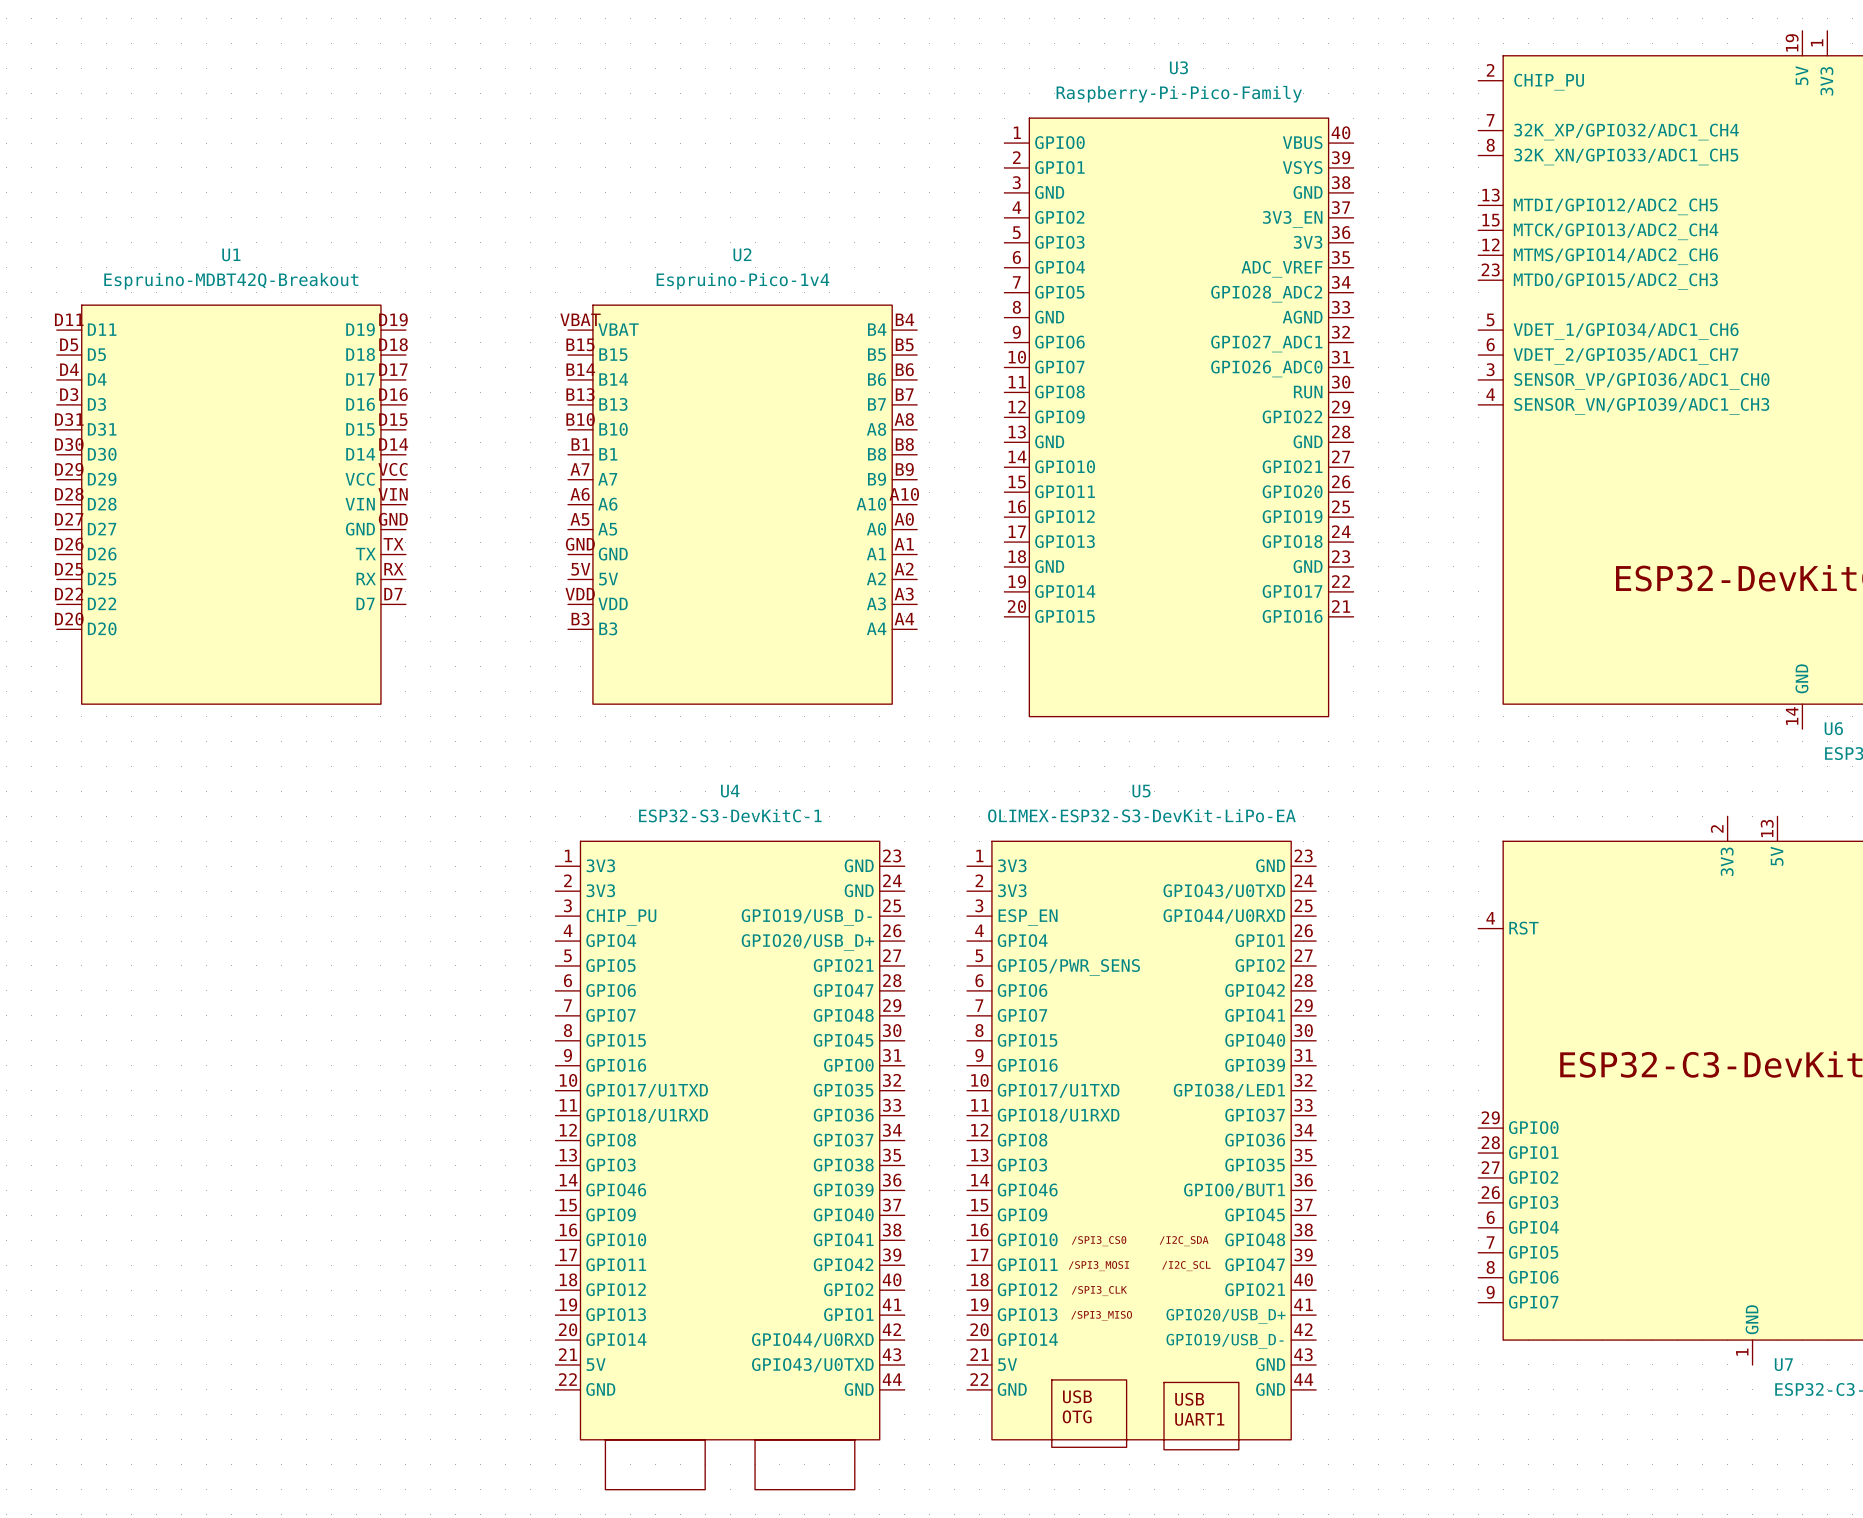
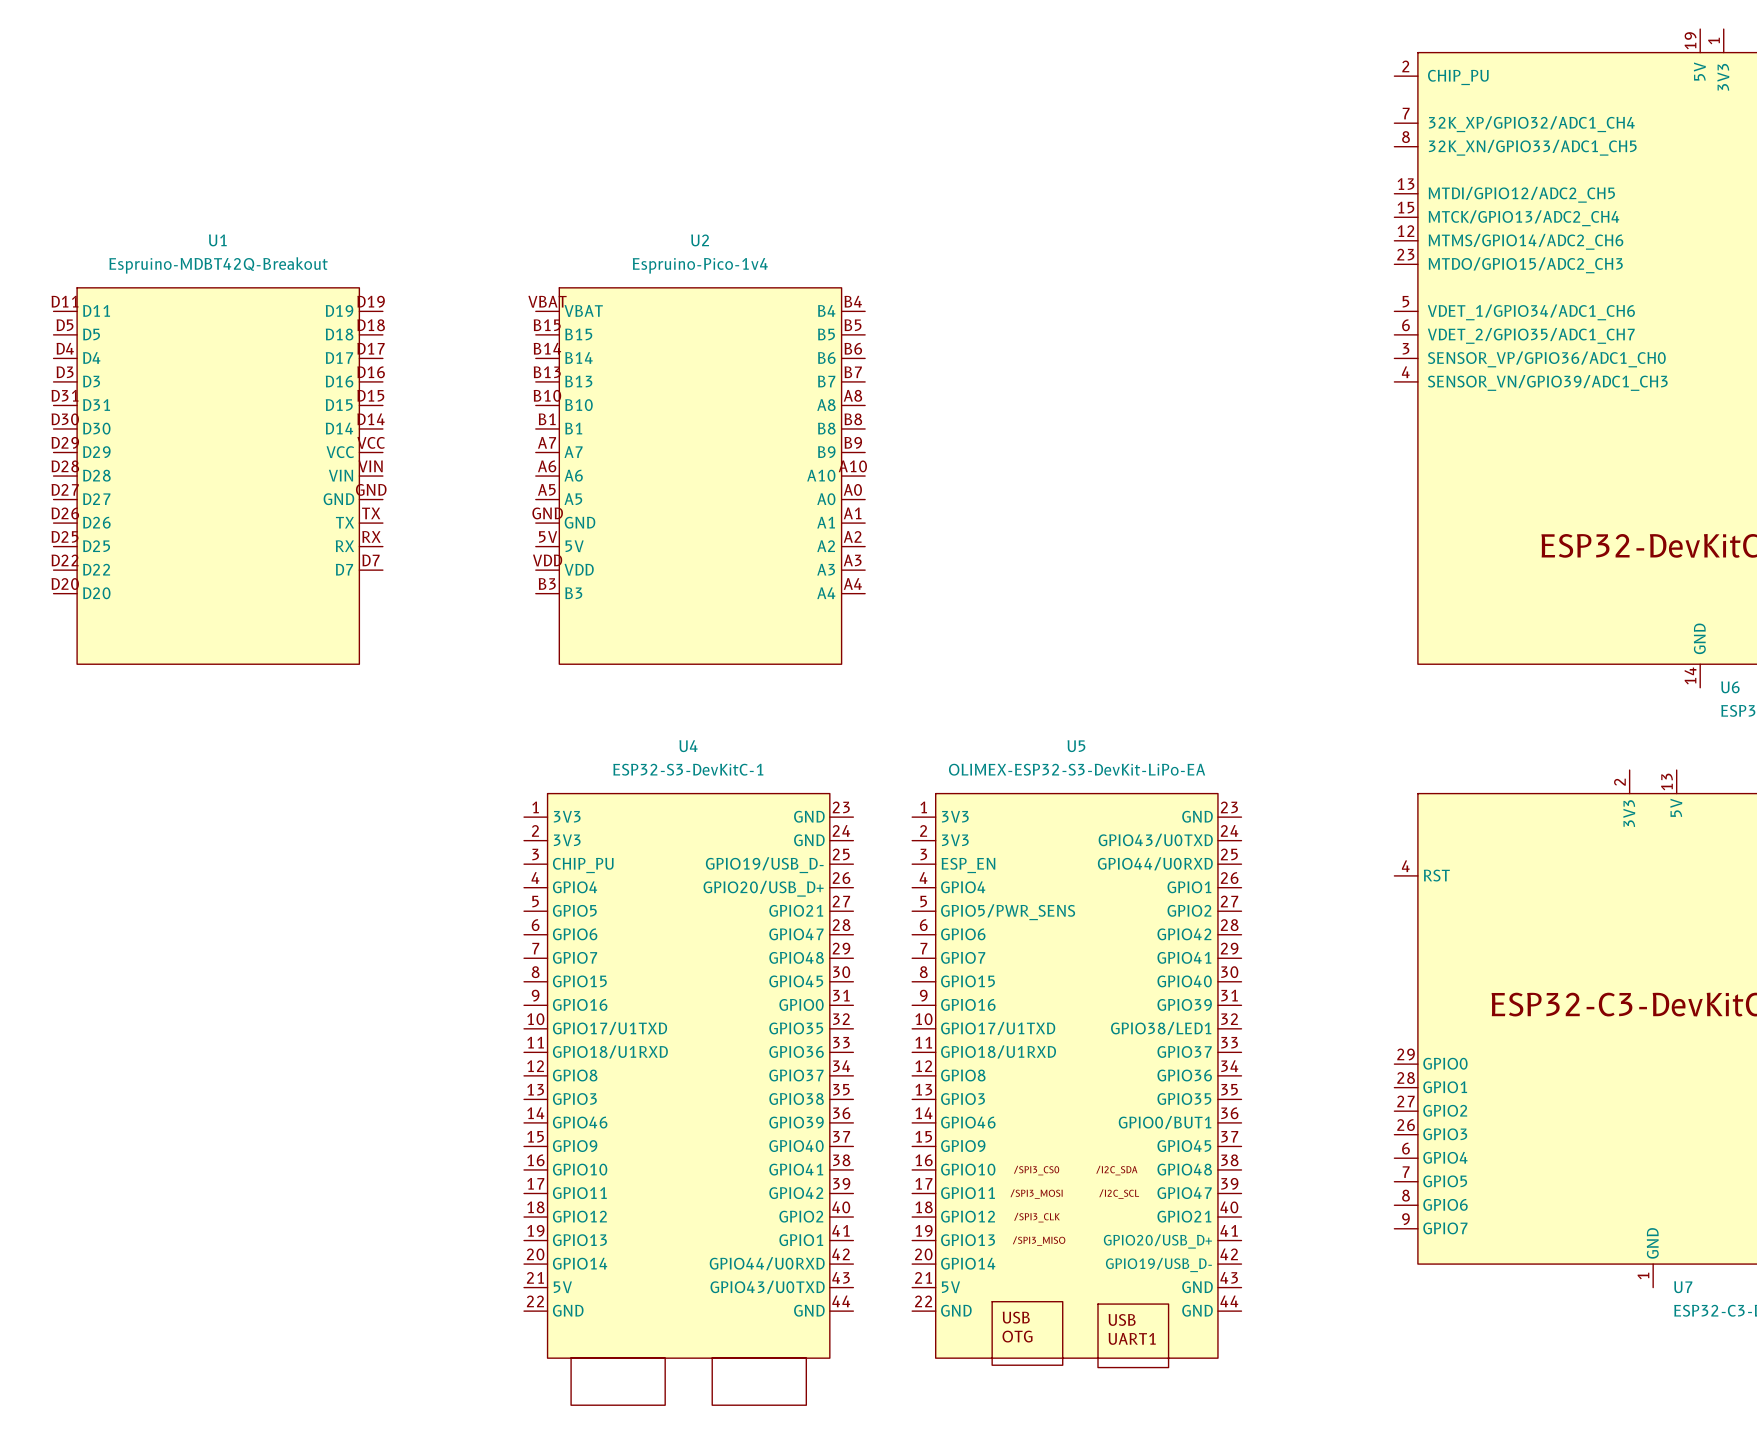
U3: Raspberry-Pi-Pico-Family (1178, 417) -> none

